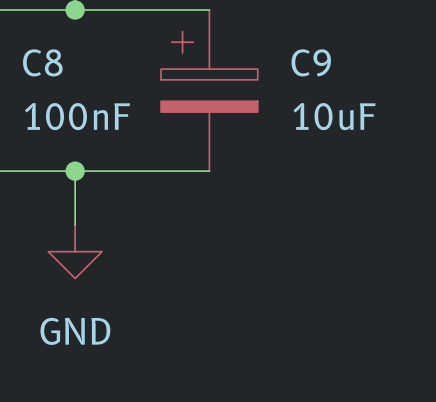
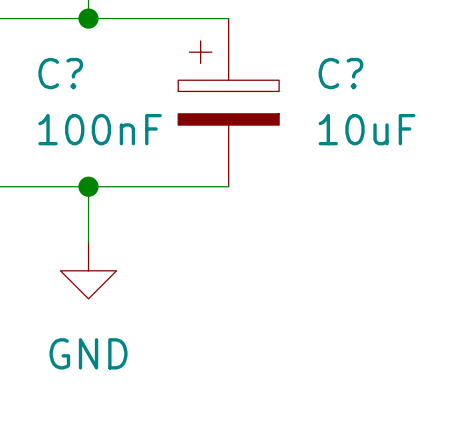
C8 name: C8 (42, 62) -> C? (60, 73)
C9 name: C9 (311, 62) -> C? (340, 73)

